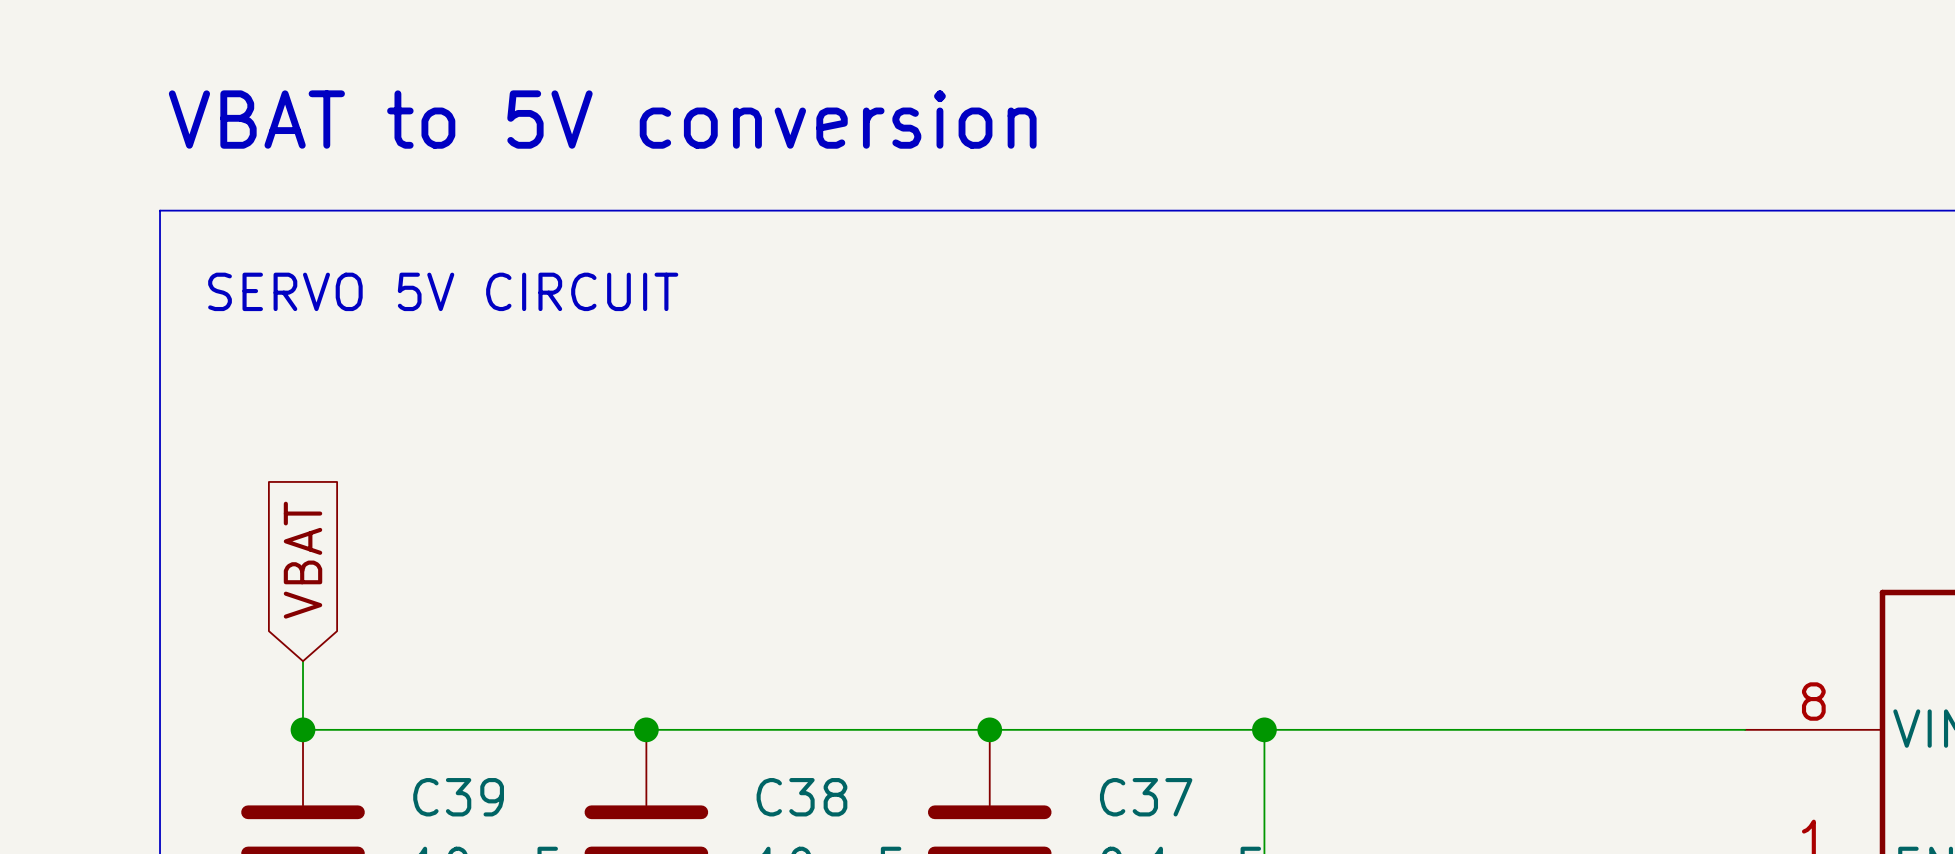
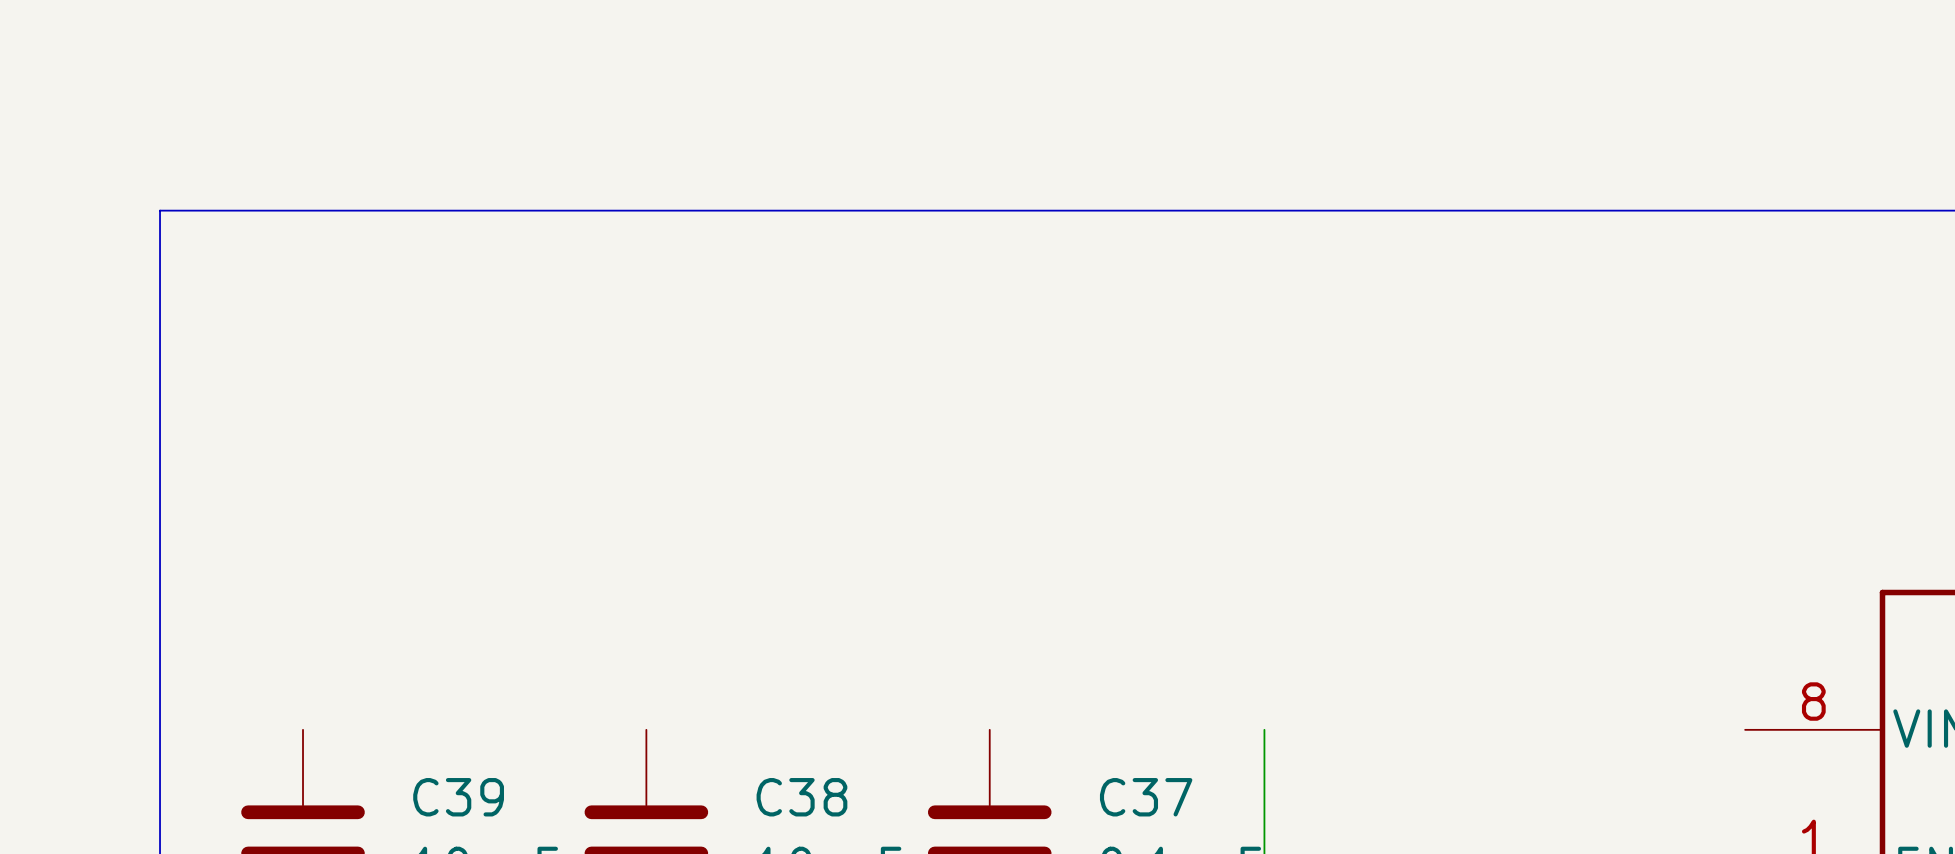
text: VBAT to 5V conversion (602, 119) -> none
text: SERVO 5V CIRCUIT (443, 291) -> none
global label: VBAT (303, 560) -> none
wire: (303, 661) (303, 729) (1745, 729) -> none
junction: (303, 729) -> none
junction: (646, 729) -> none
junction: (989, 729) -> none
junction: (1264, 729) -> none

